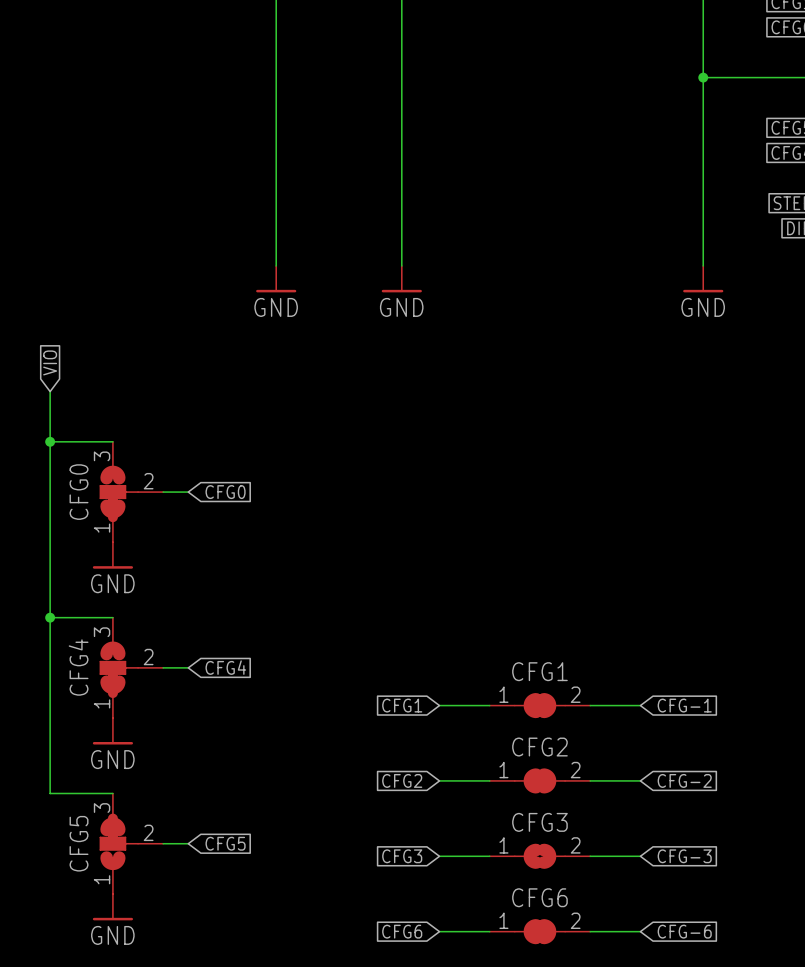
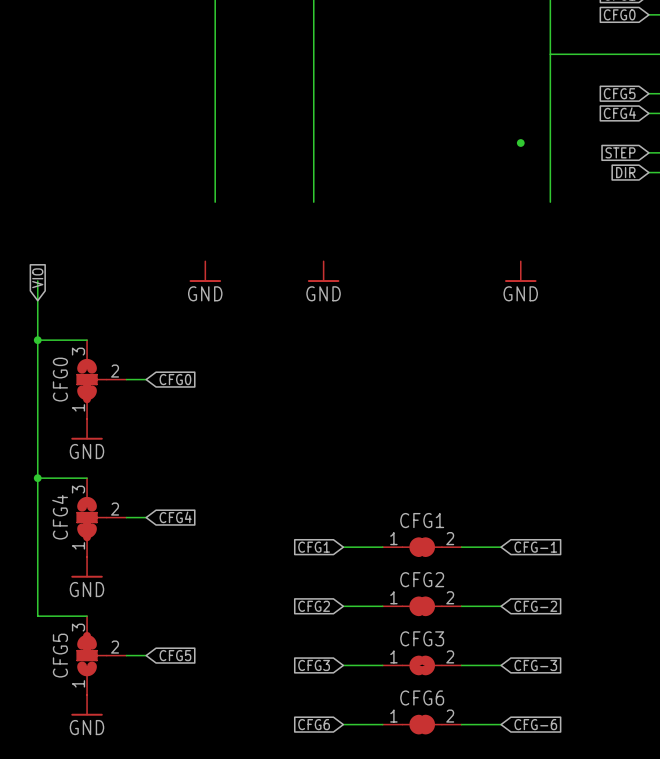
junction: (703, 77) -> none
junction: none -> (520, 143)
power symbol position: GND (276, 279) -> GND (205, 271)
power symbol position: GND (401, 279) -> GND (323, 271)
power symbol position: GND (703, 279) -> GND (520, 271)
wire: none -> (37, 281) (37, 300)

